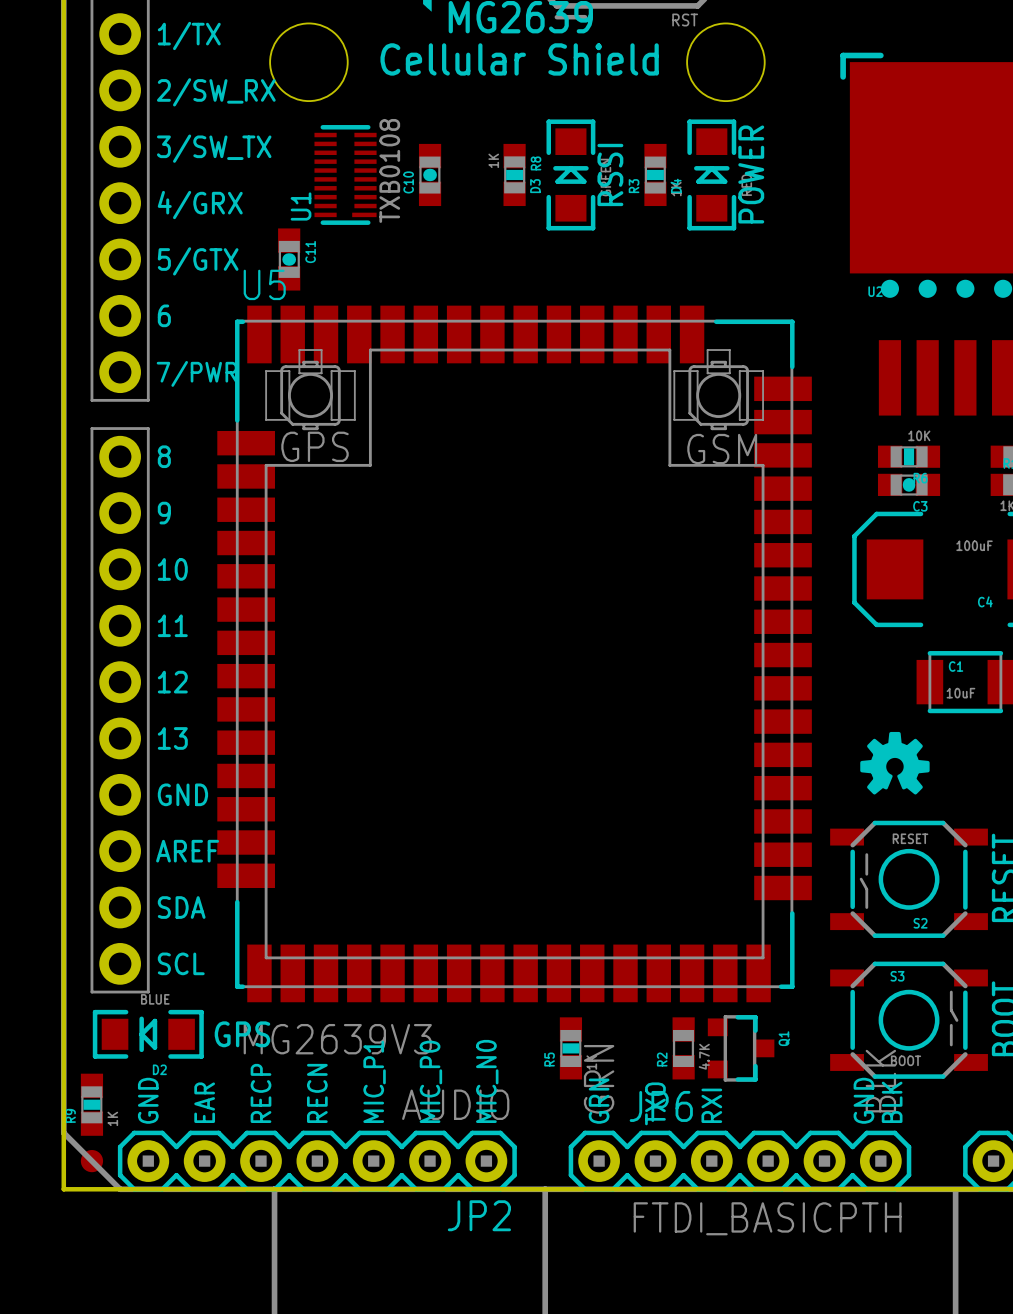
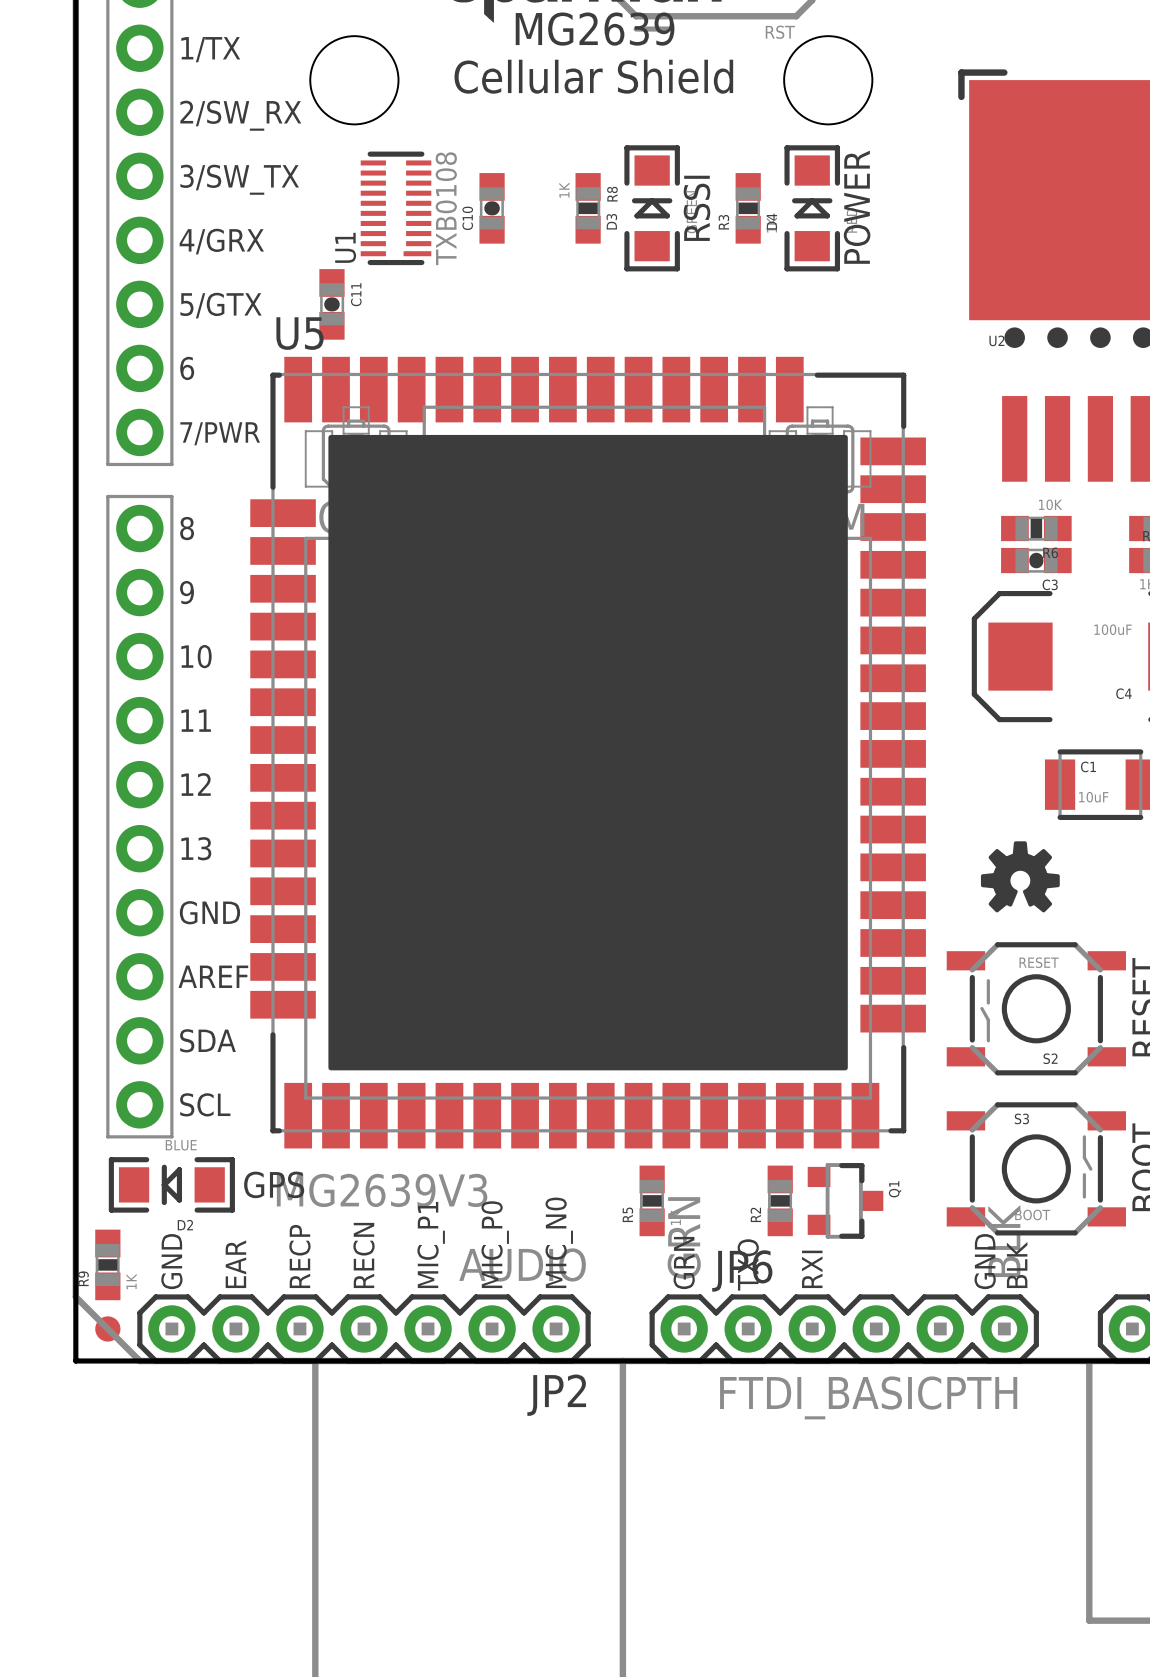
U5 footprint: [217, 305, 812, 1003] -> [250, 356, 926, 1149]
R2 footprint: [672, 1017, 695, 1080] -> [767, 1165, 793, 1237]
R2 value: 4.7K (704, 1056) -> none

